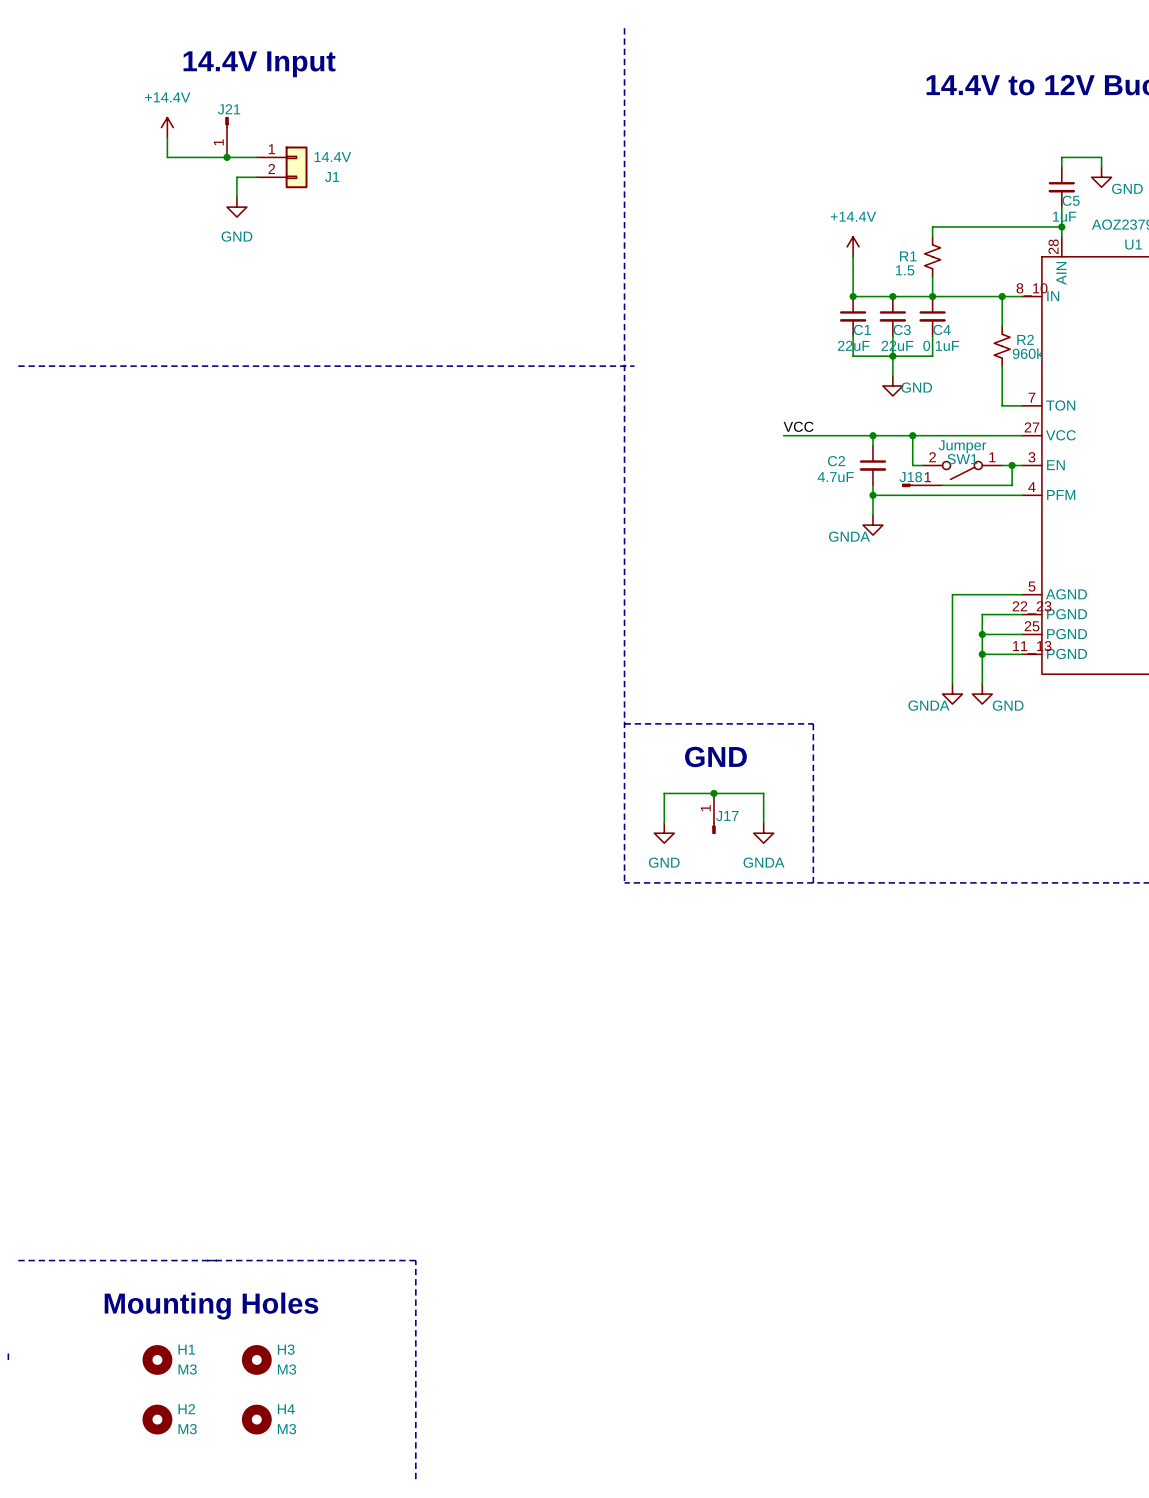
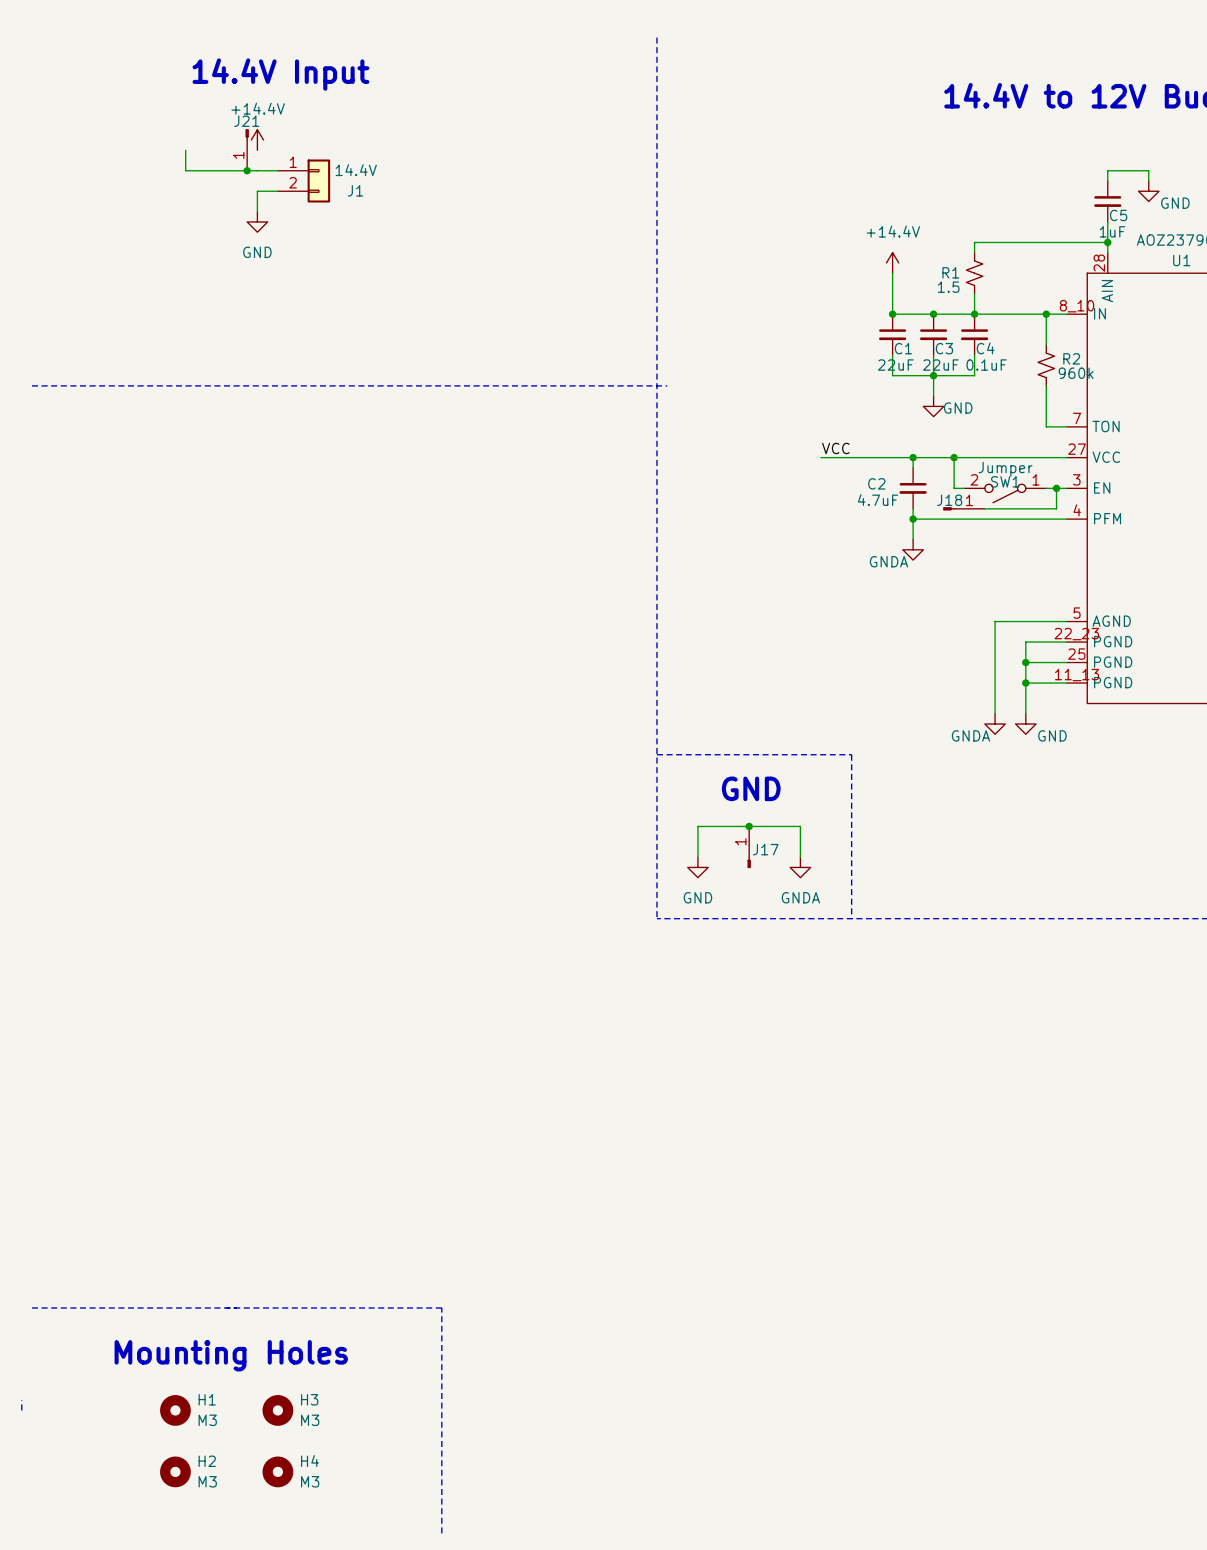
power symbol position: +14.4V (167, 127) -> +14.4V (257, 140)

